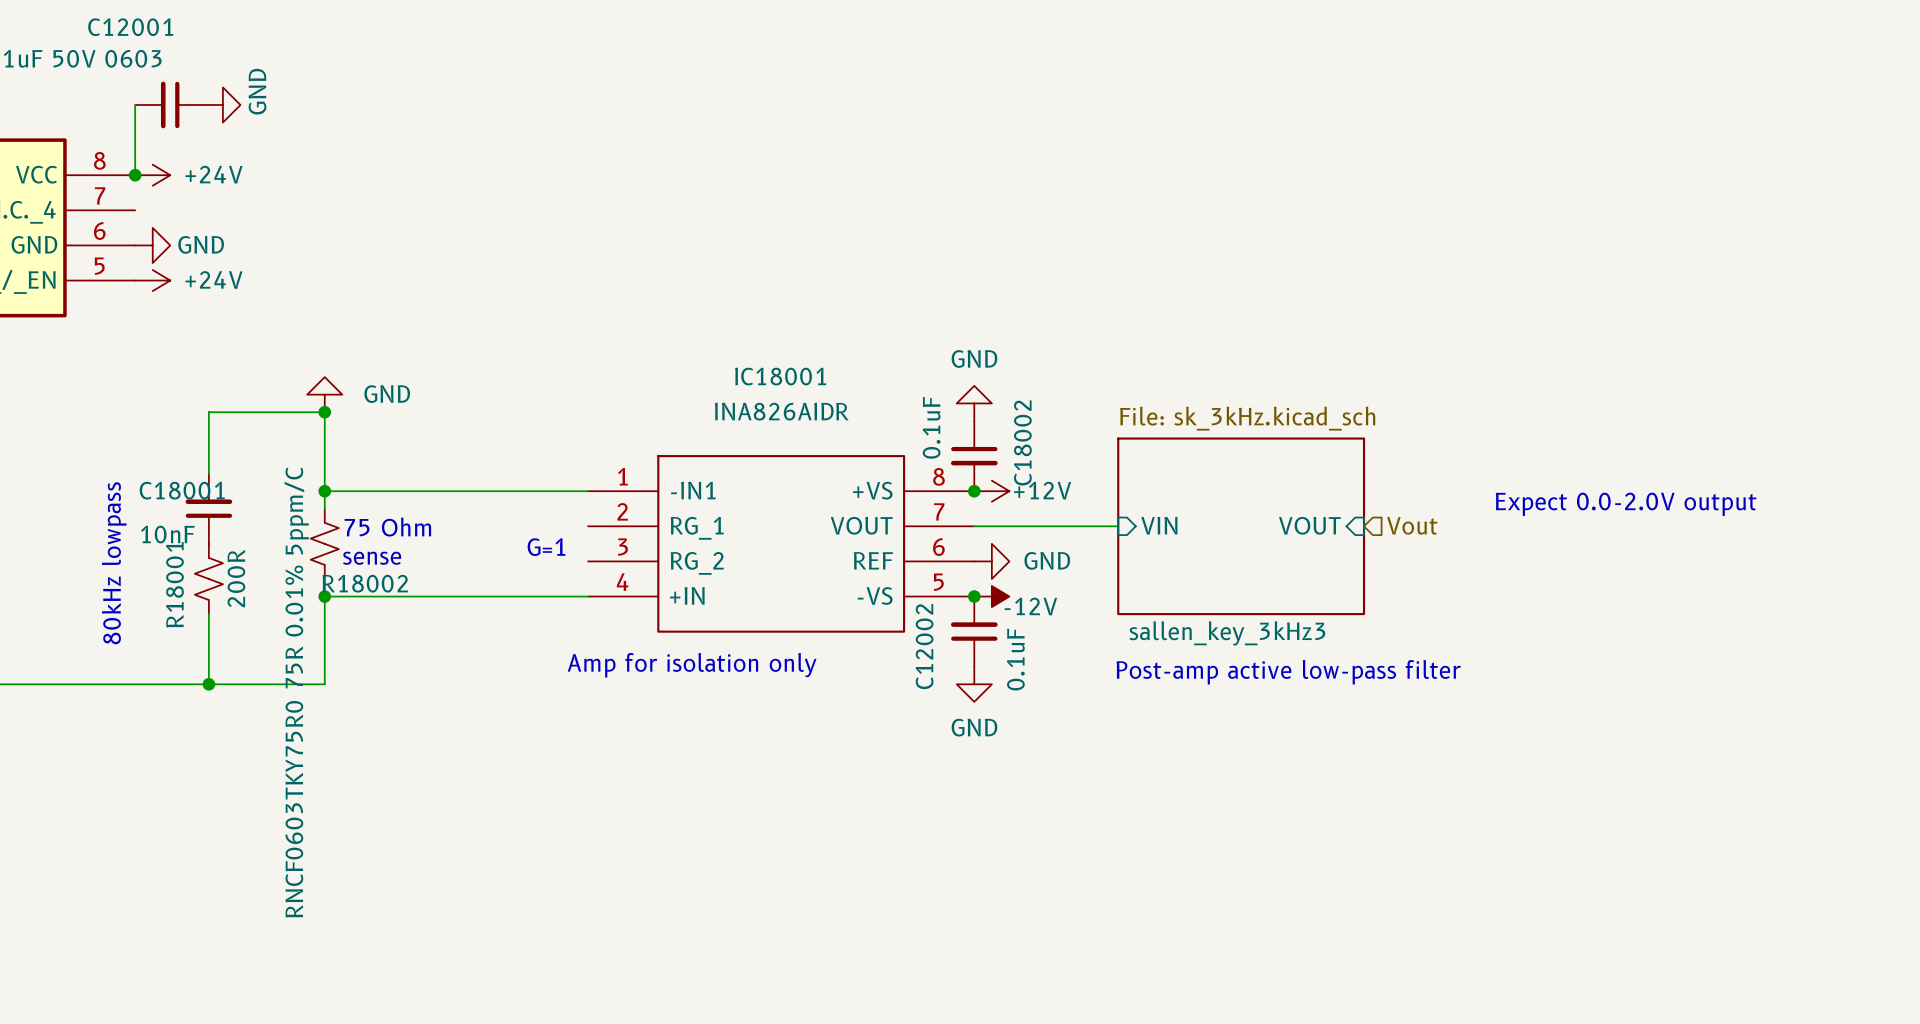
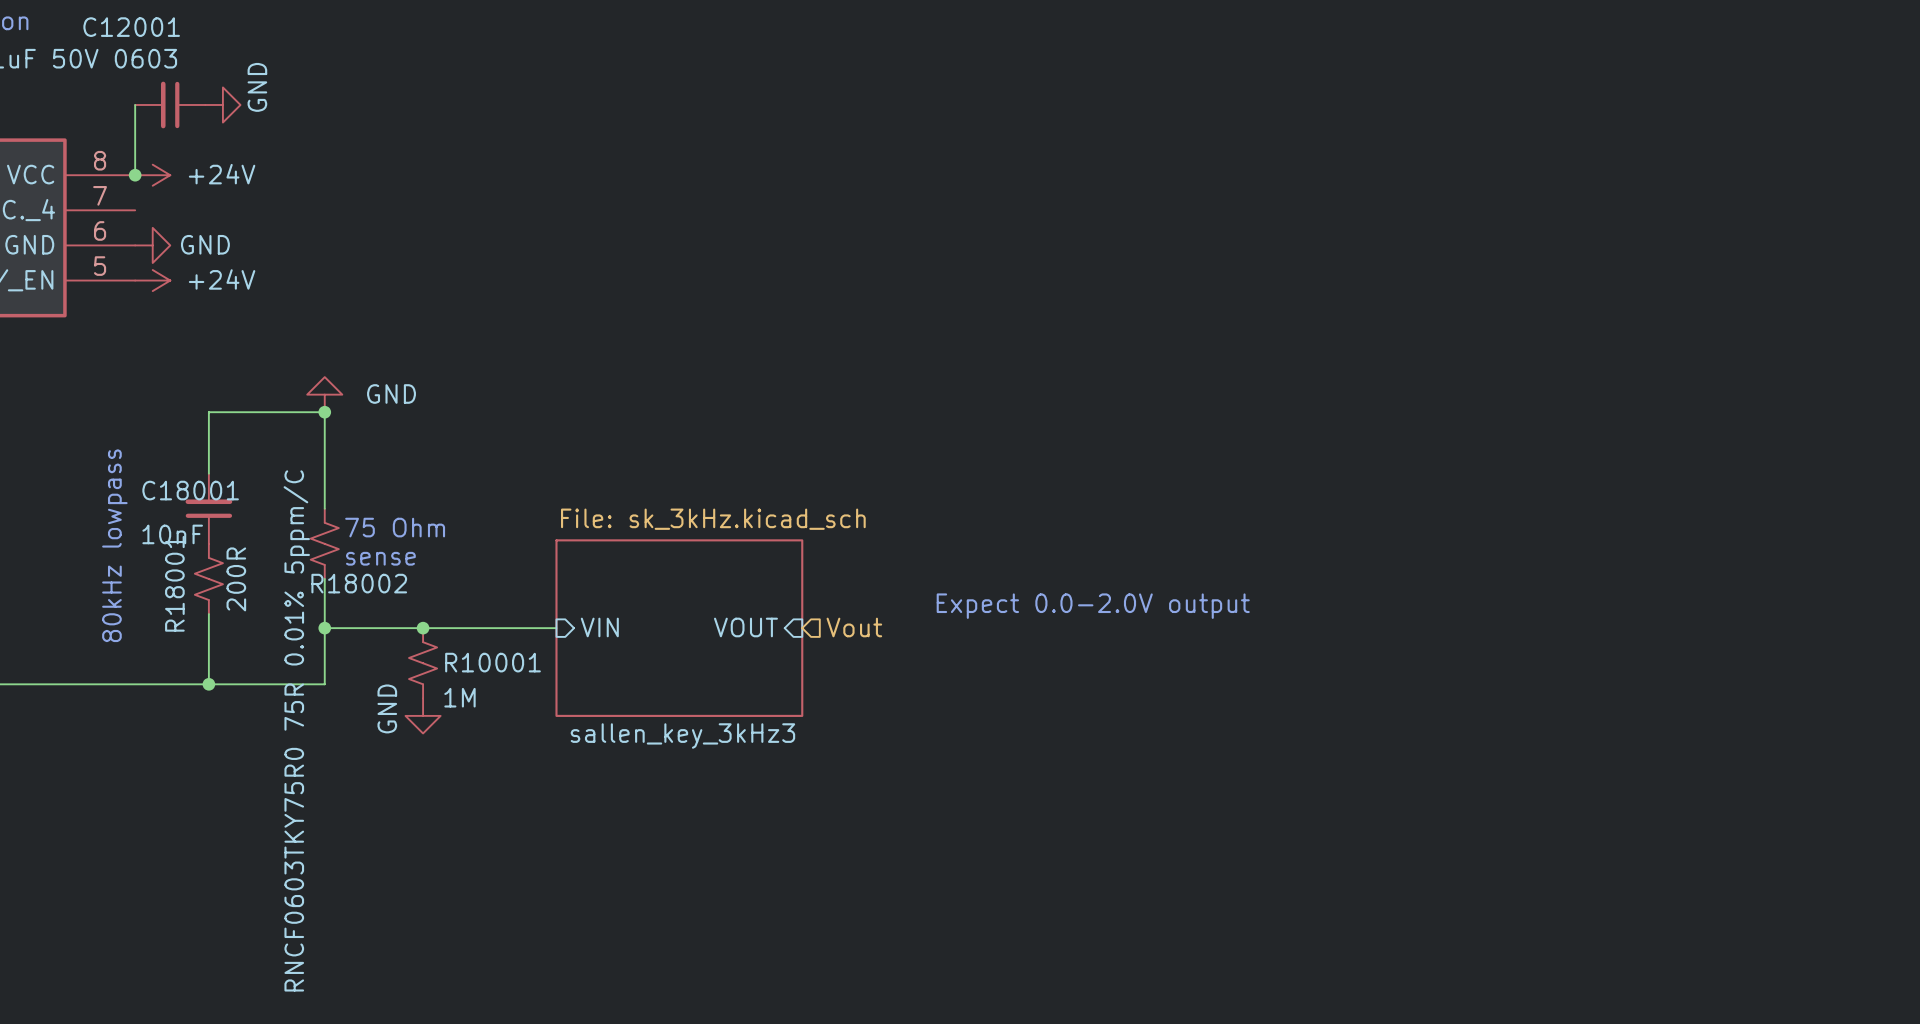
power symbol: GND (974, 403) -> none
C18002: 0.1uF (974, 456) -> none
wire: (324, 491) (588, 491) -> none
junction: (324, 491) -> none
junction: (974, 491) -> none
power symbol: +12V (991, 491) -> none
text: Expect 0.0-2.0V output (1626, 504) -> none
sheet pin: VIN (1159, 525) -> none
sheet pin: VOUT (1309, 525) -> none
hierarchical label: Vout (1412, 525) -> none
wire: (974, 526) (1118, 526) -> none
sheet sallen_key_3kHz3 position: (1241, 526) -> (679, 628)
IC18001: INA826AIDR (781, 543) -> none
text: G=1 (546, 547) -> none
power symbol: GND (991, 561) -> none
wire: (324, 596) (588, 596) -> none
junction position: (324, 596) -> (324, 628)
junction: (974, 596) -> none
power symbol: -12V (991, 596) -> none
text: none -> Expect 0.0-2.0V output (1093, 606)
sheet pin: none -> VIN (599, 627)
sheet pin: none -> VOUT (745, 627)
hierarchical label: none -> Vout (854, 627)
wire: none -> (324, 628) (556, 628)
junction: none -> (423, 628)
C12002: 0.1uF (974, 631) -> none
R10001: none -> 1M (423, 663)
text: Amp for isolation only (692, 665) -> none
text: Post-amp active low-pass filter (1288, 672) -> none
power symbol: GND (974, 684) -> none
power symbol: none -> GND (423, 715)

